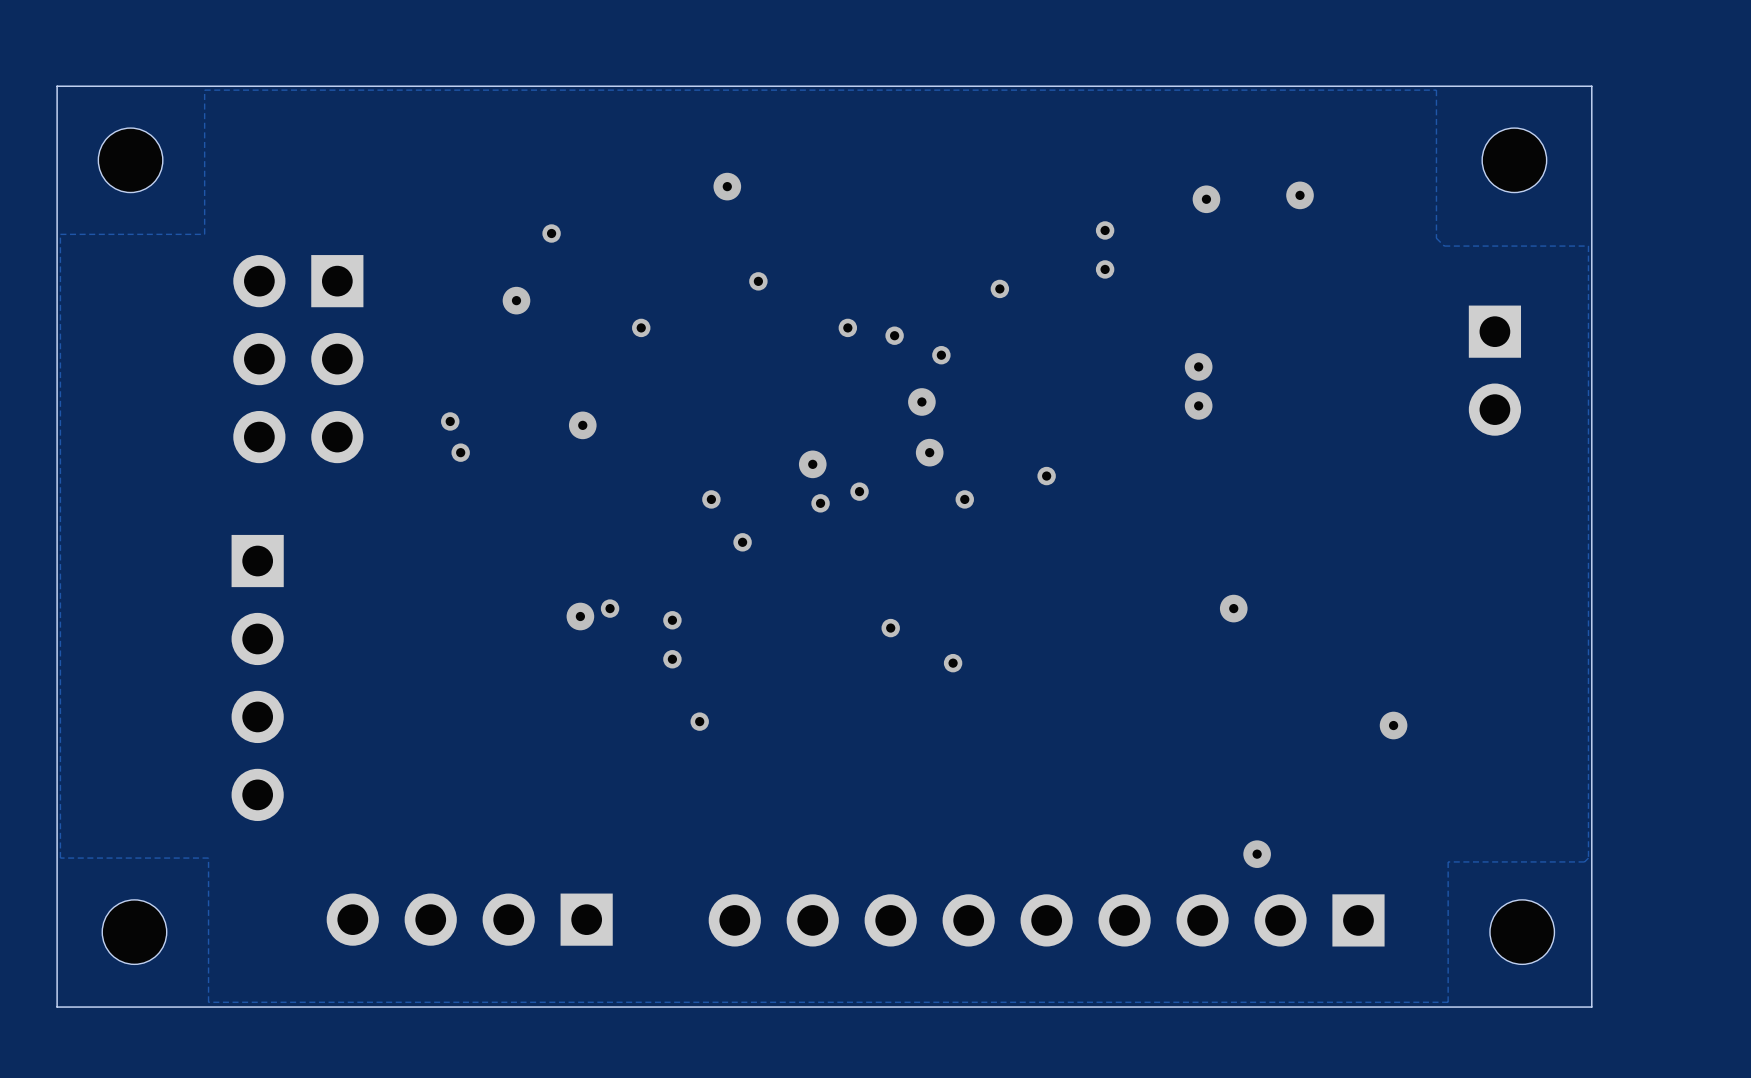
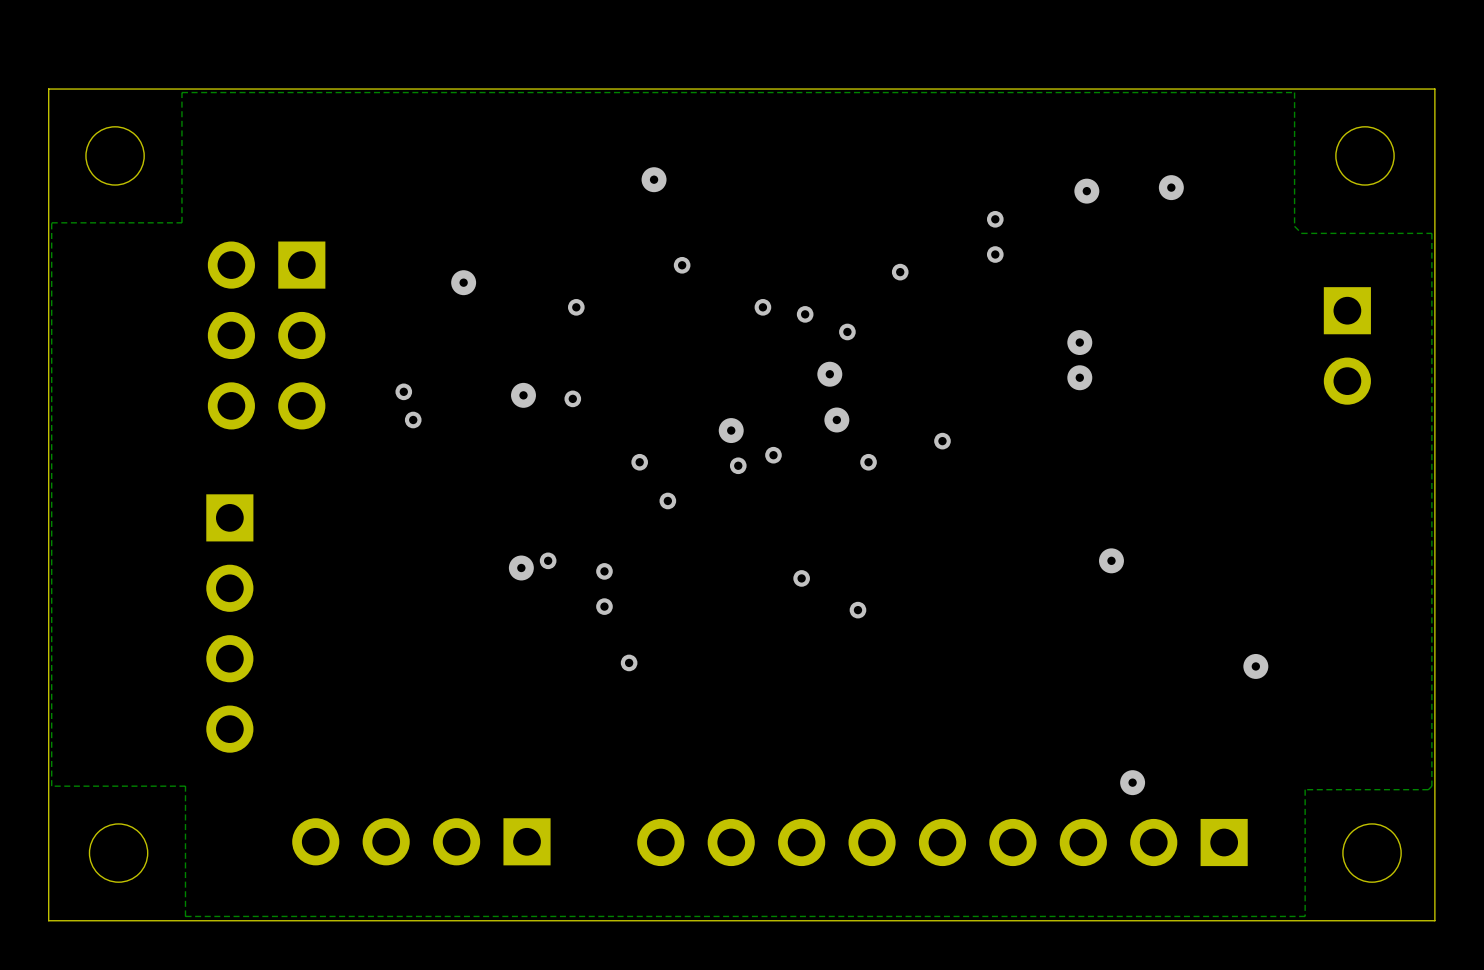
via: (551, 233) -> none
via: none -> (572, 398)

